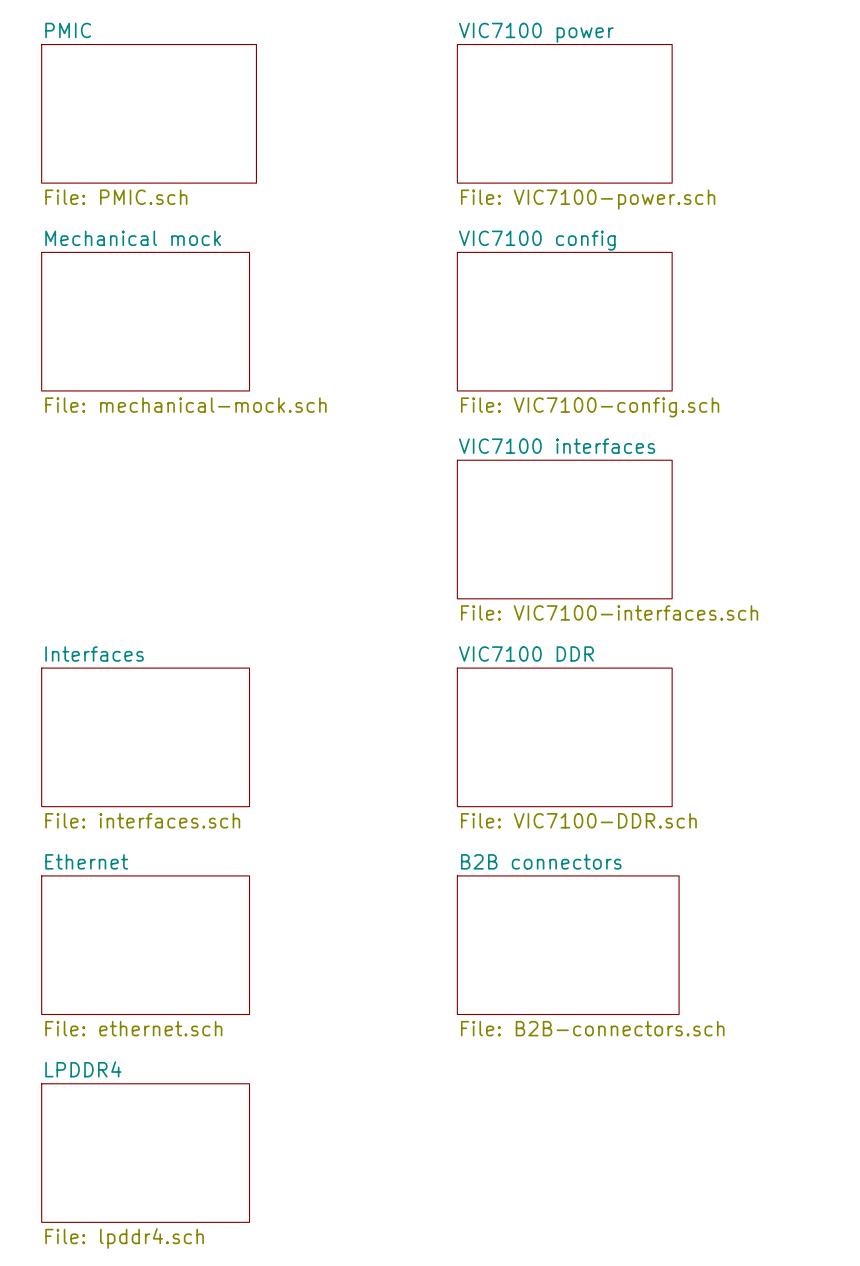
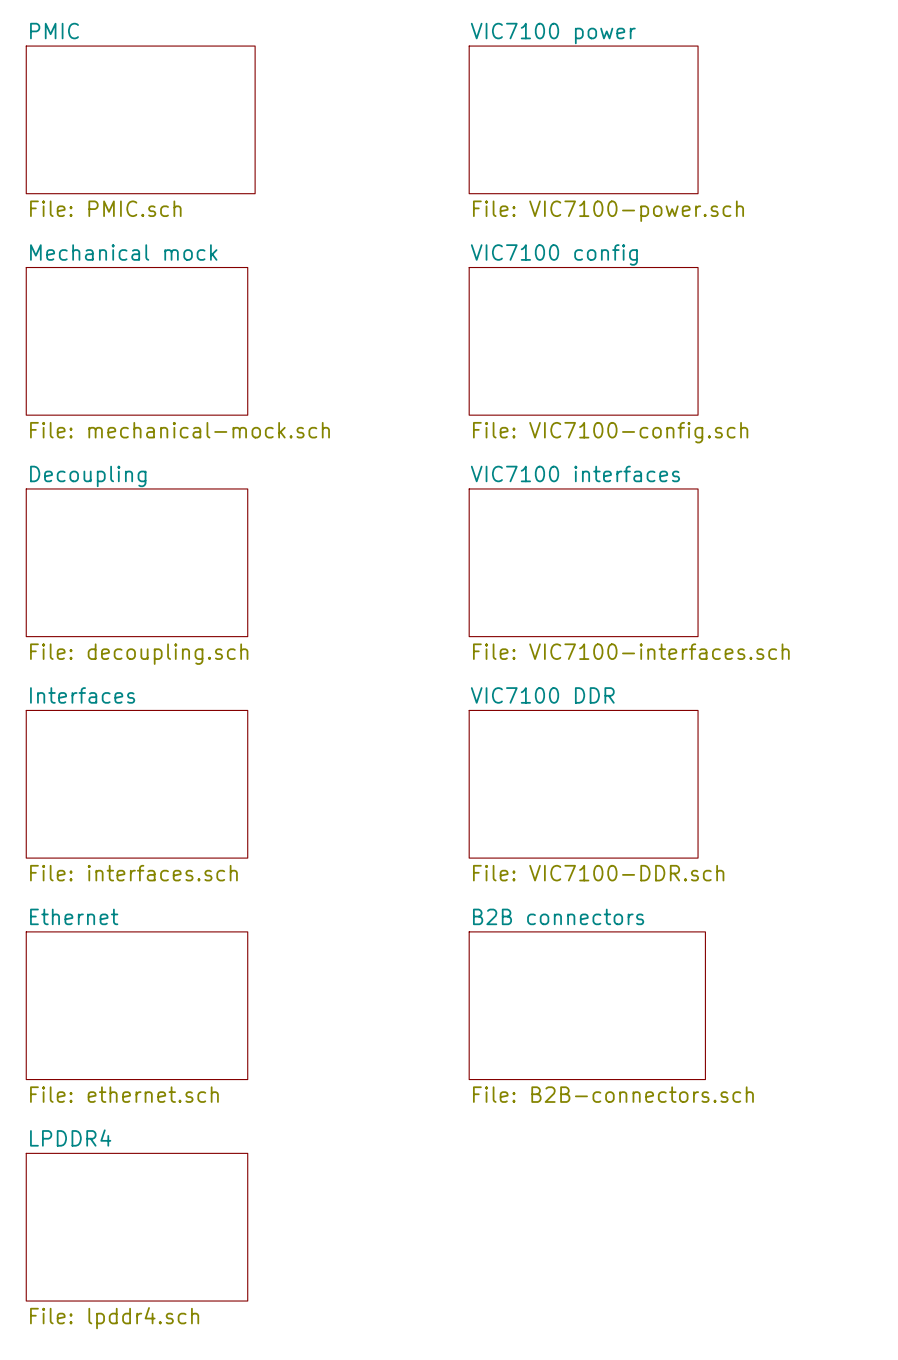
sheet Decoupling: none -> File: decoupling.sch (136, 562)

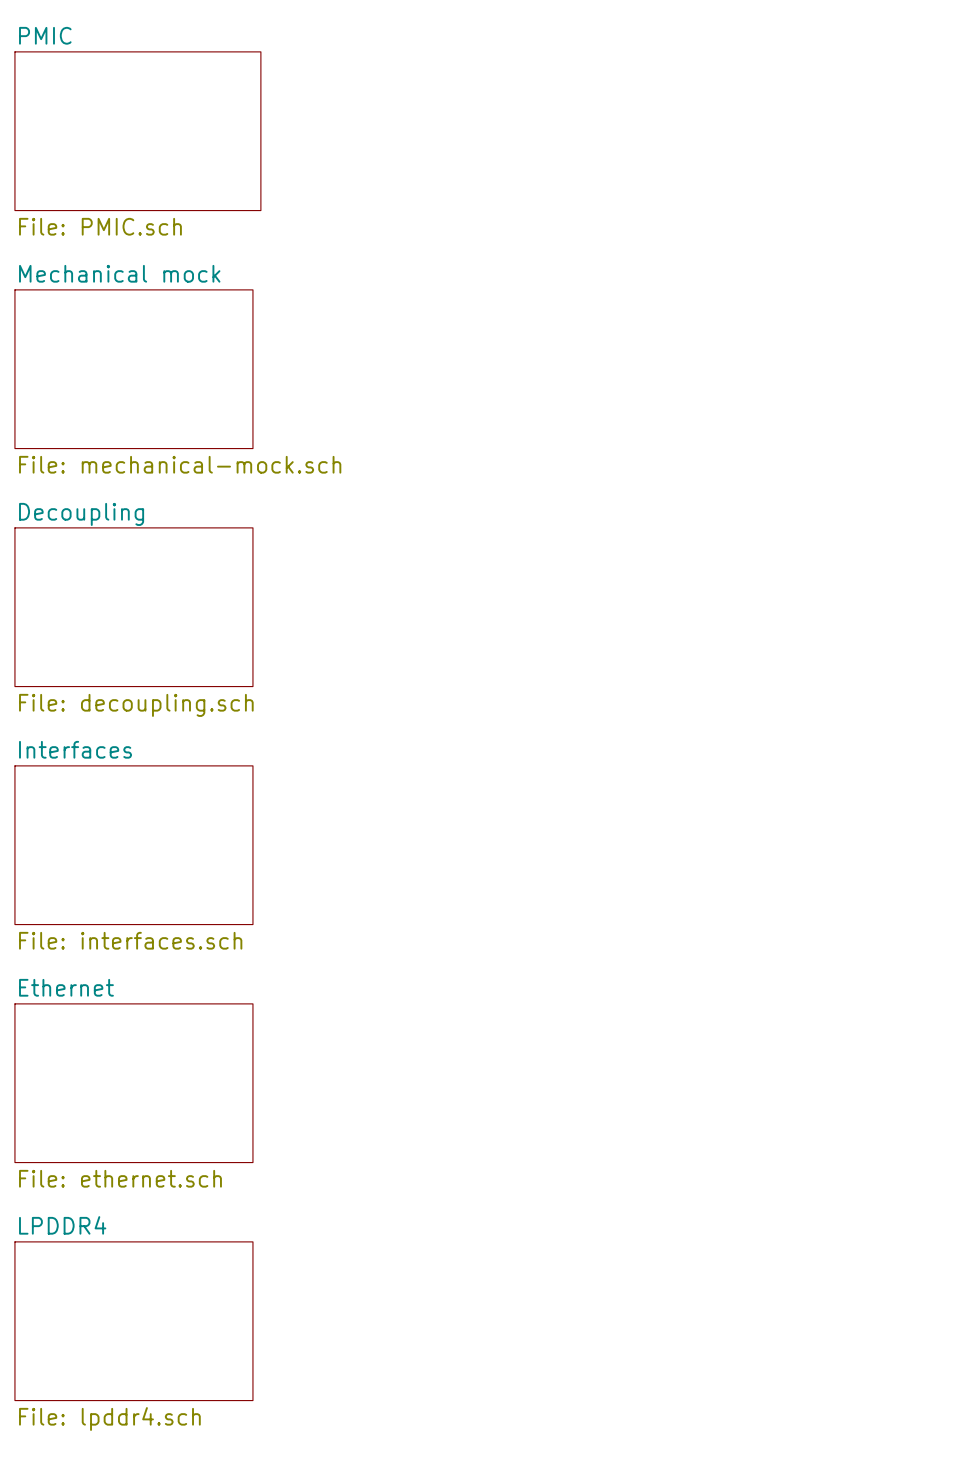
sheet VIC7100 power: File: VIC7100-power.sch (583, 119) -> none
sheet VIC7100 config: File: VIC7100-config.sch (583, 341) -> none
sheet VIC7100 interfaces: File: VIC7100-interfaces.sch (583, 562) -> none
sheet VIC7100 DDR: File: VIC7100-DDR.sch (583, 784) -> none
sheet B2B connectors: File: B2B-connectors.sch (587, 1005) -> none

